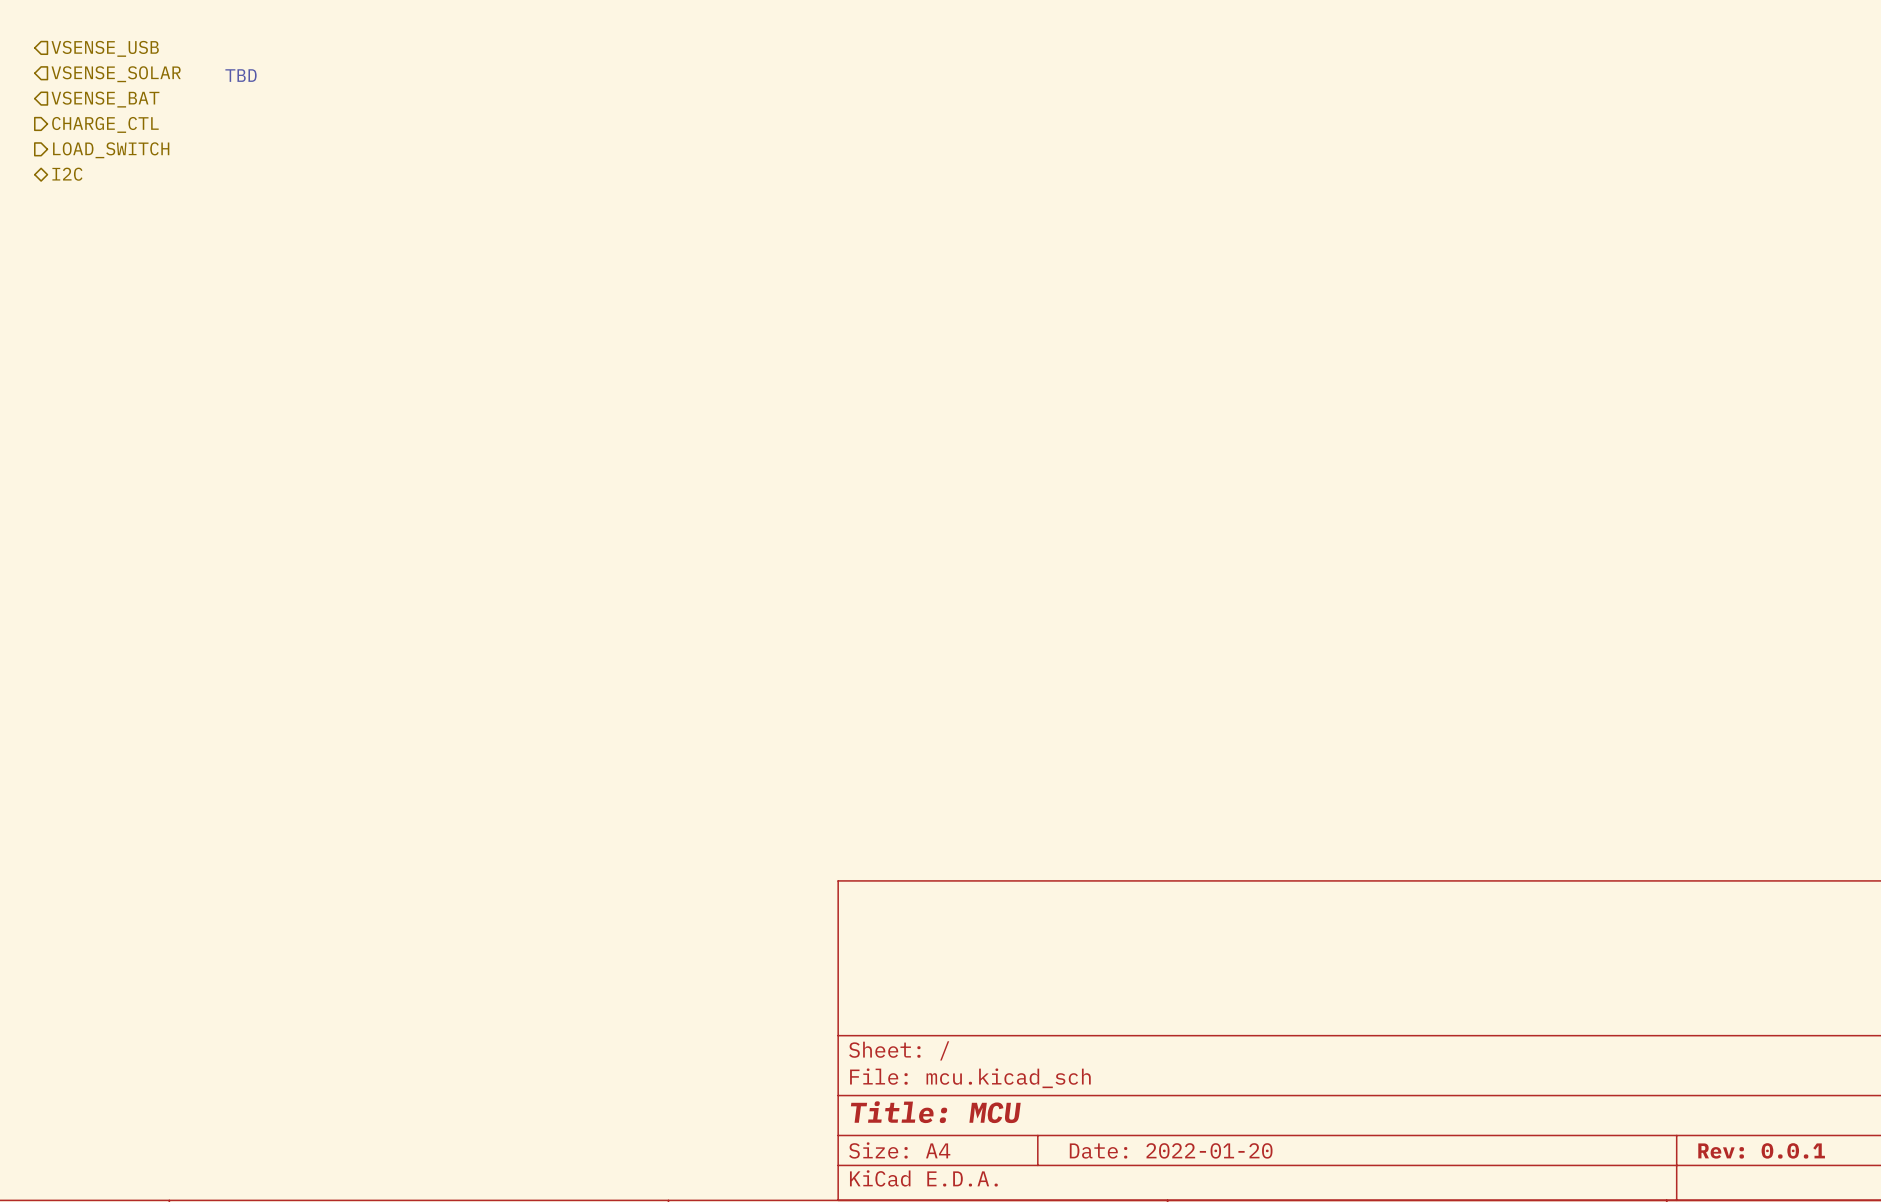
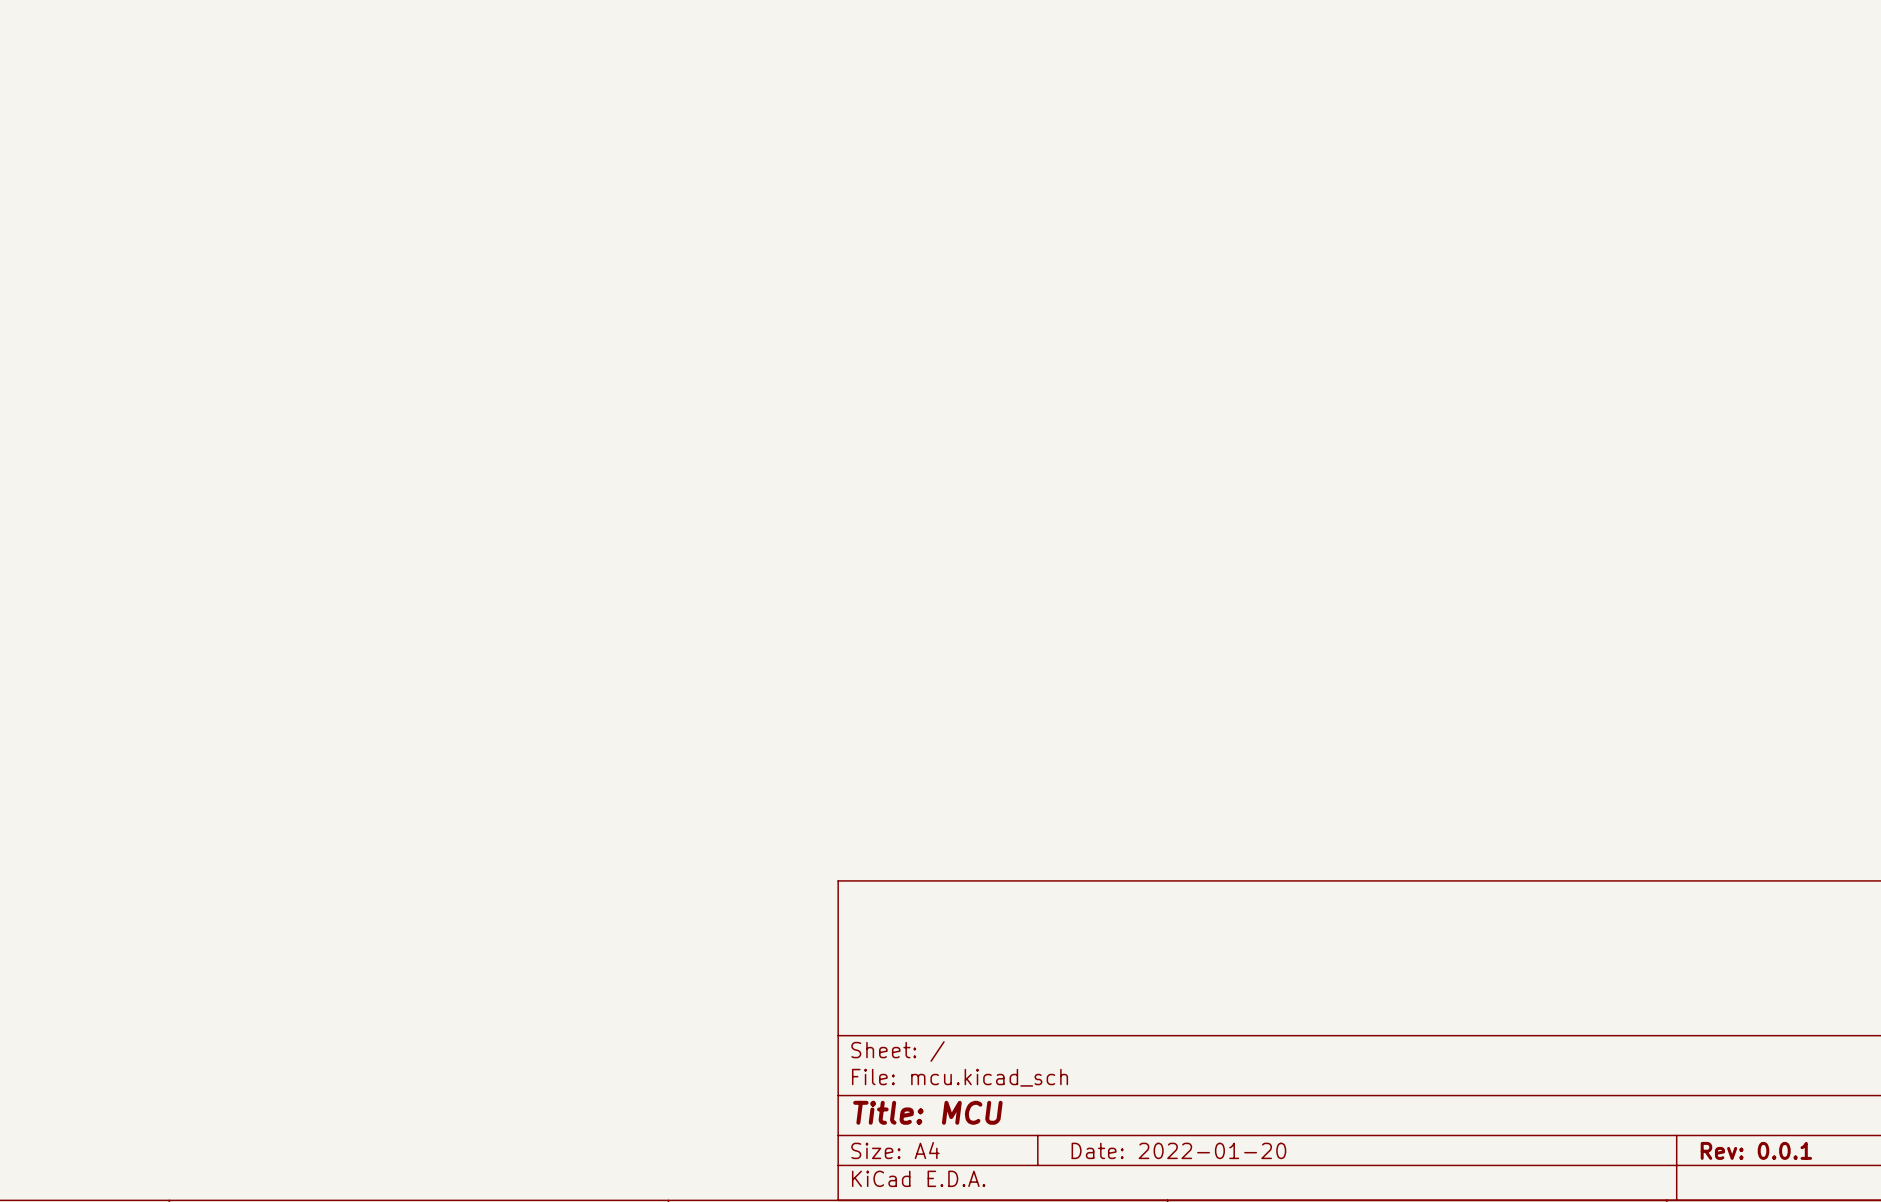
hierarchical label: VSENSE_USB (105, 48) -> none
hierarchical label: VSENSE_SOLAR (116, 74) -> none
text: TBD (241, 75) -> none
hierarchical label: VSENSE_BAT (105, 99) -> none
hierarchical label: CHARGE_CTL (105, 124) -> none
hierarchical label: LOAD_SWITCH (111, 150) -> none
hierarchical label: I2C (67, 174) -> none

